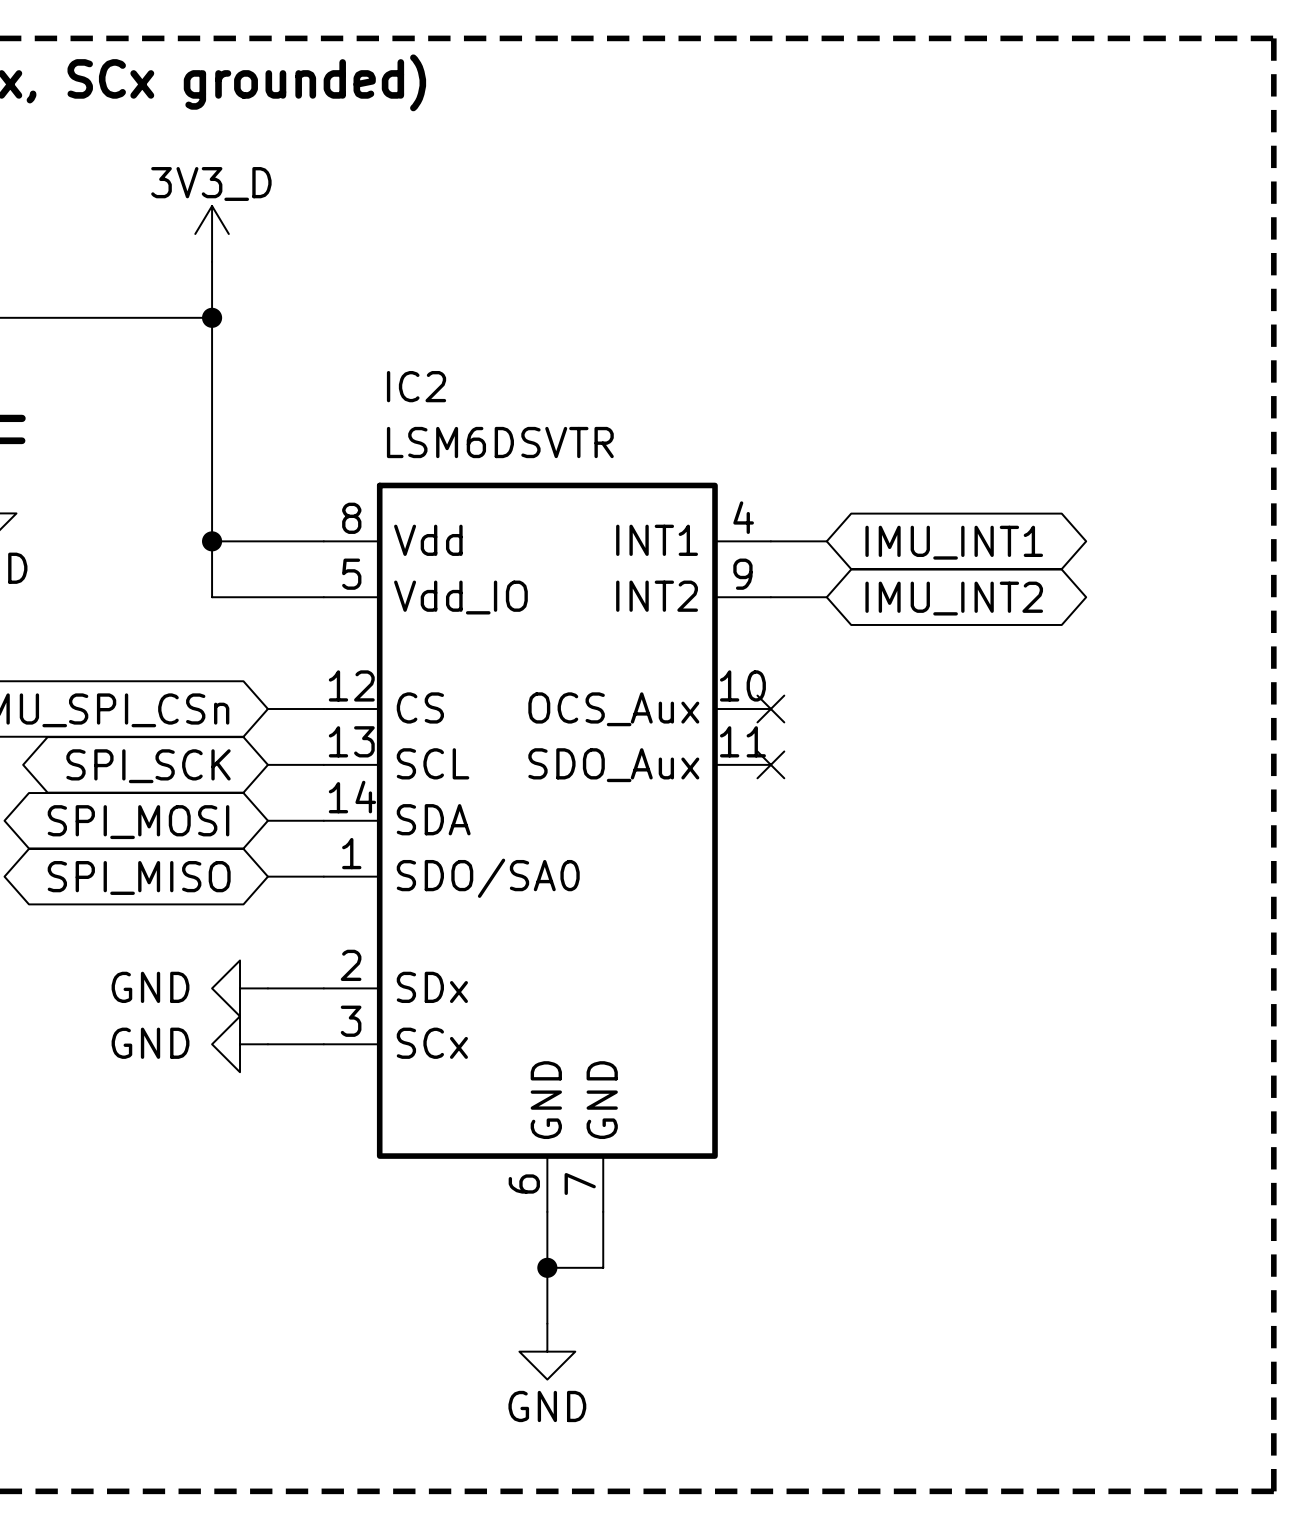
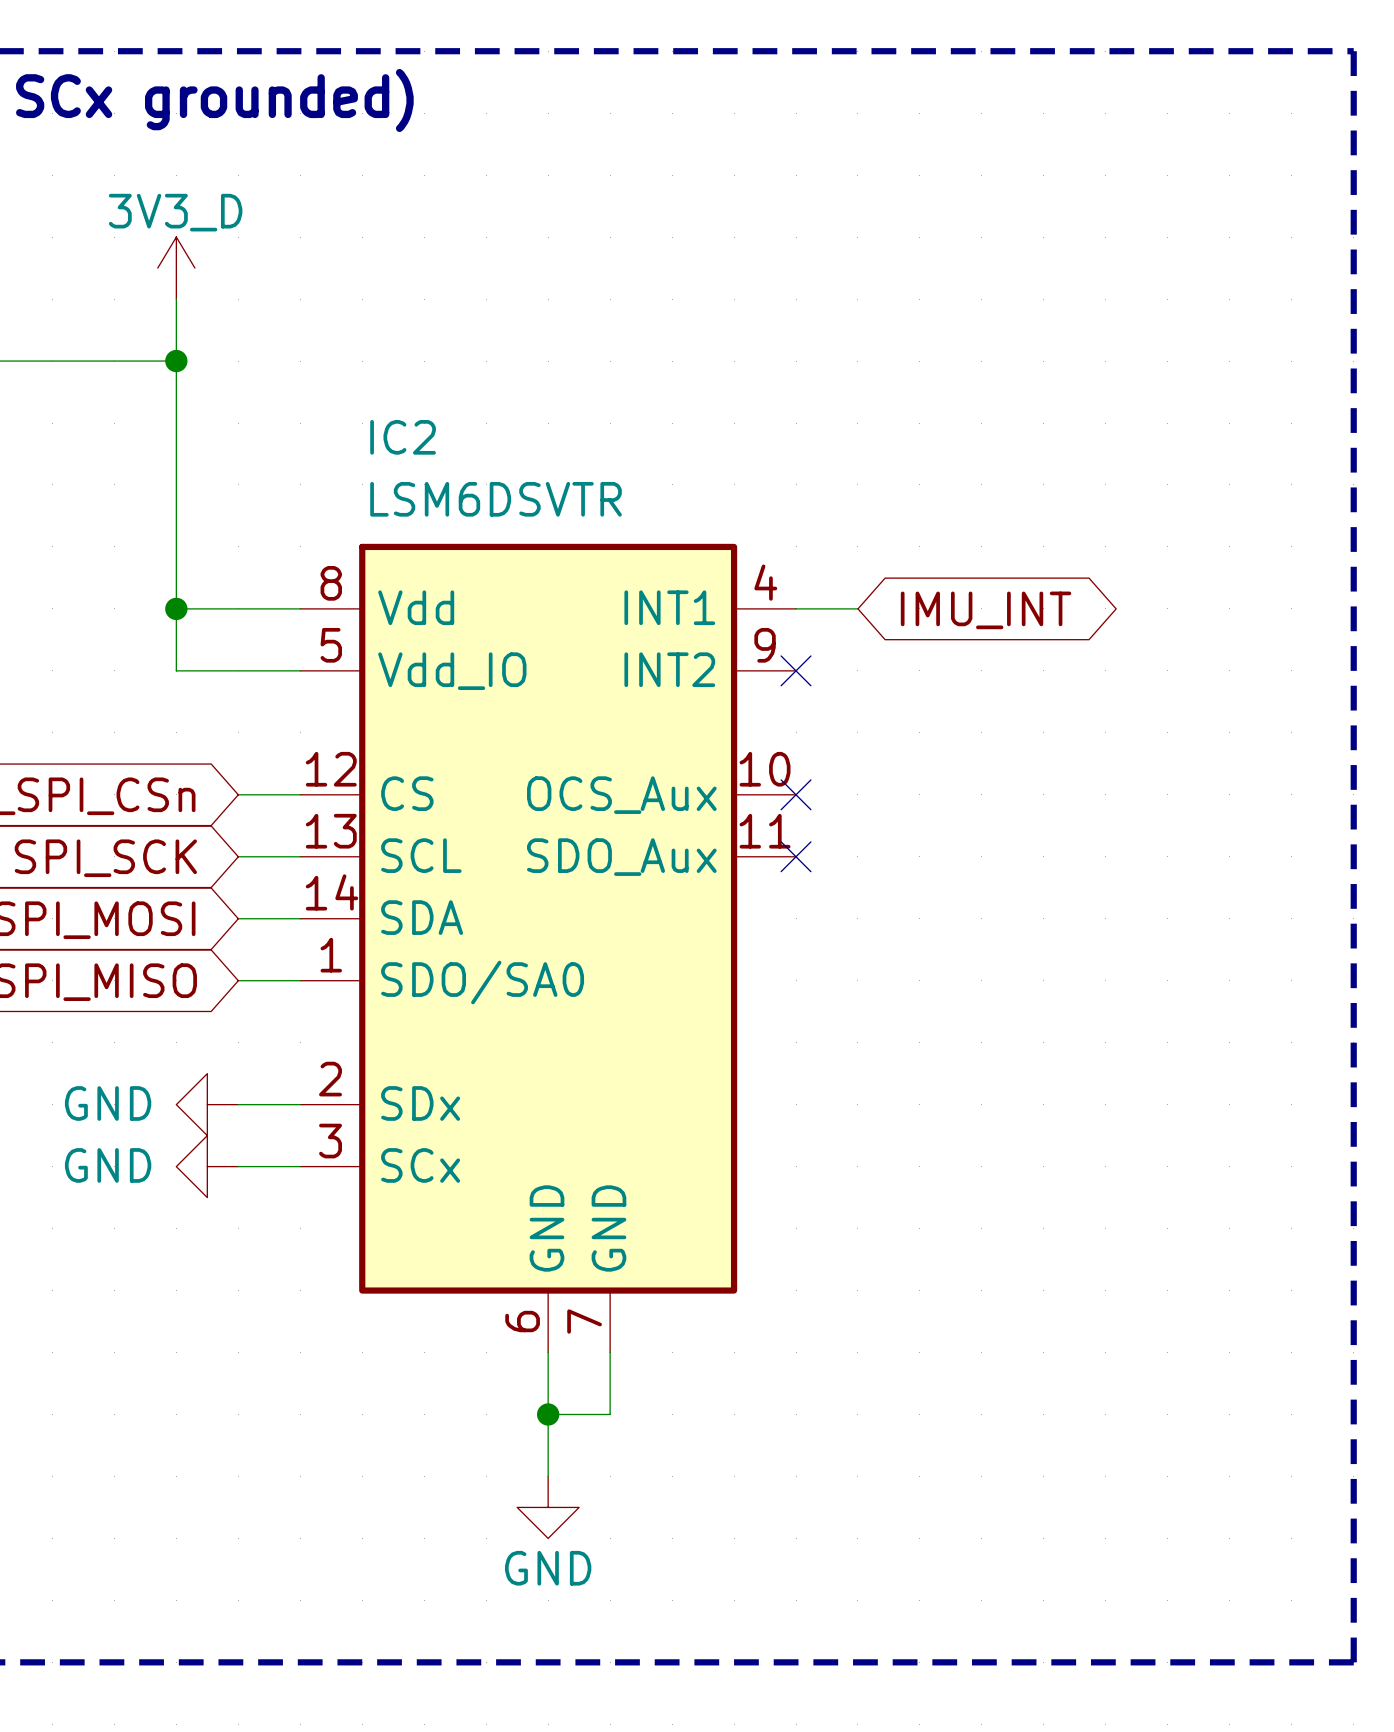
global label: IMU_INT1 (954, 542) -> IMU_INT (986, 610)
wire: (770, 597) (826, 597) -> none
no-connect mark: none -> (796, 670)
global label: IMU_INT2 (954, 598) -> none

